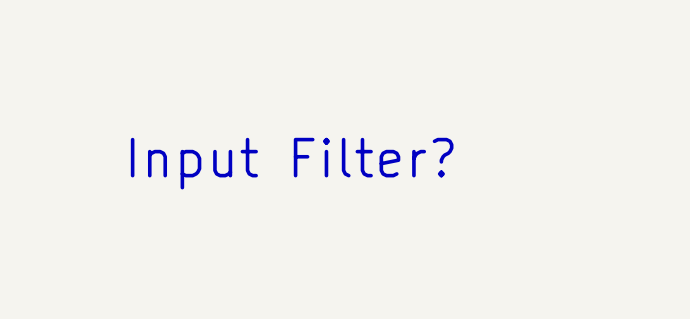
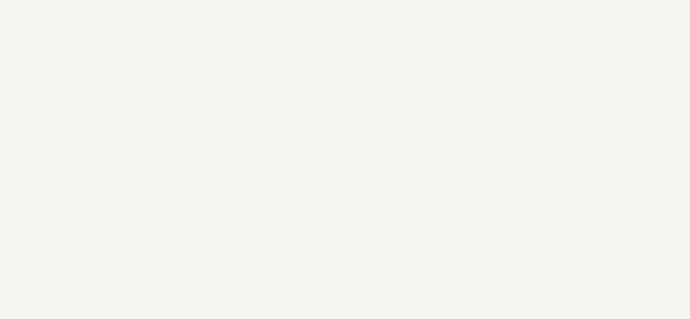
text: Input Filter? (292, 163) -> none

